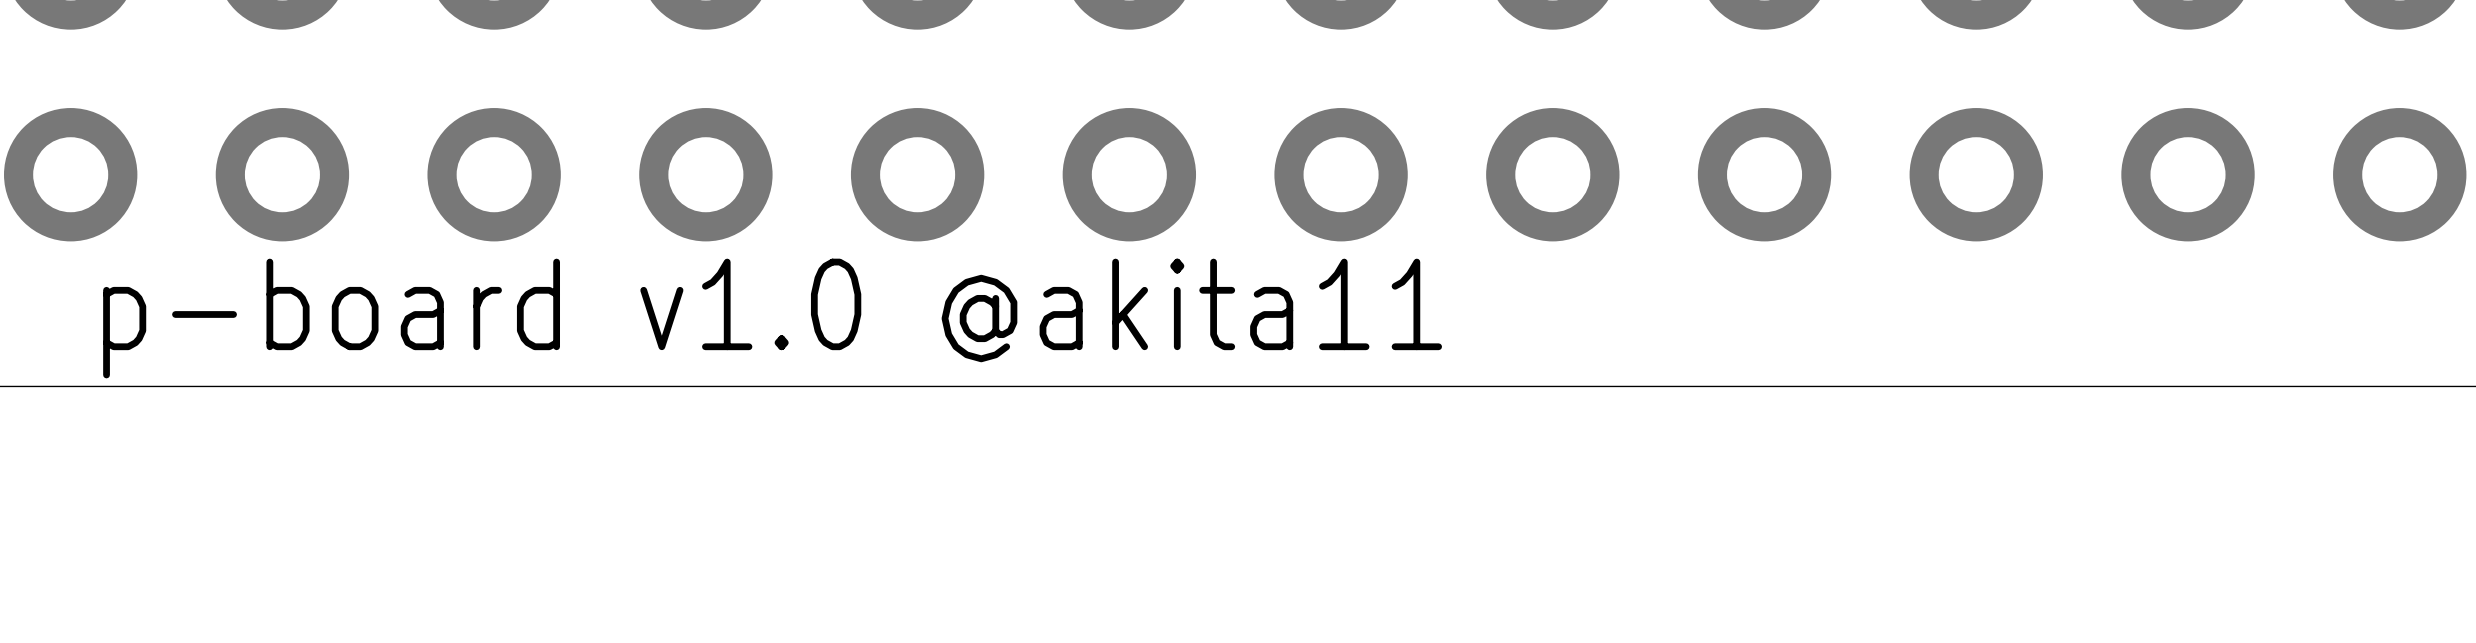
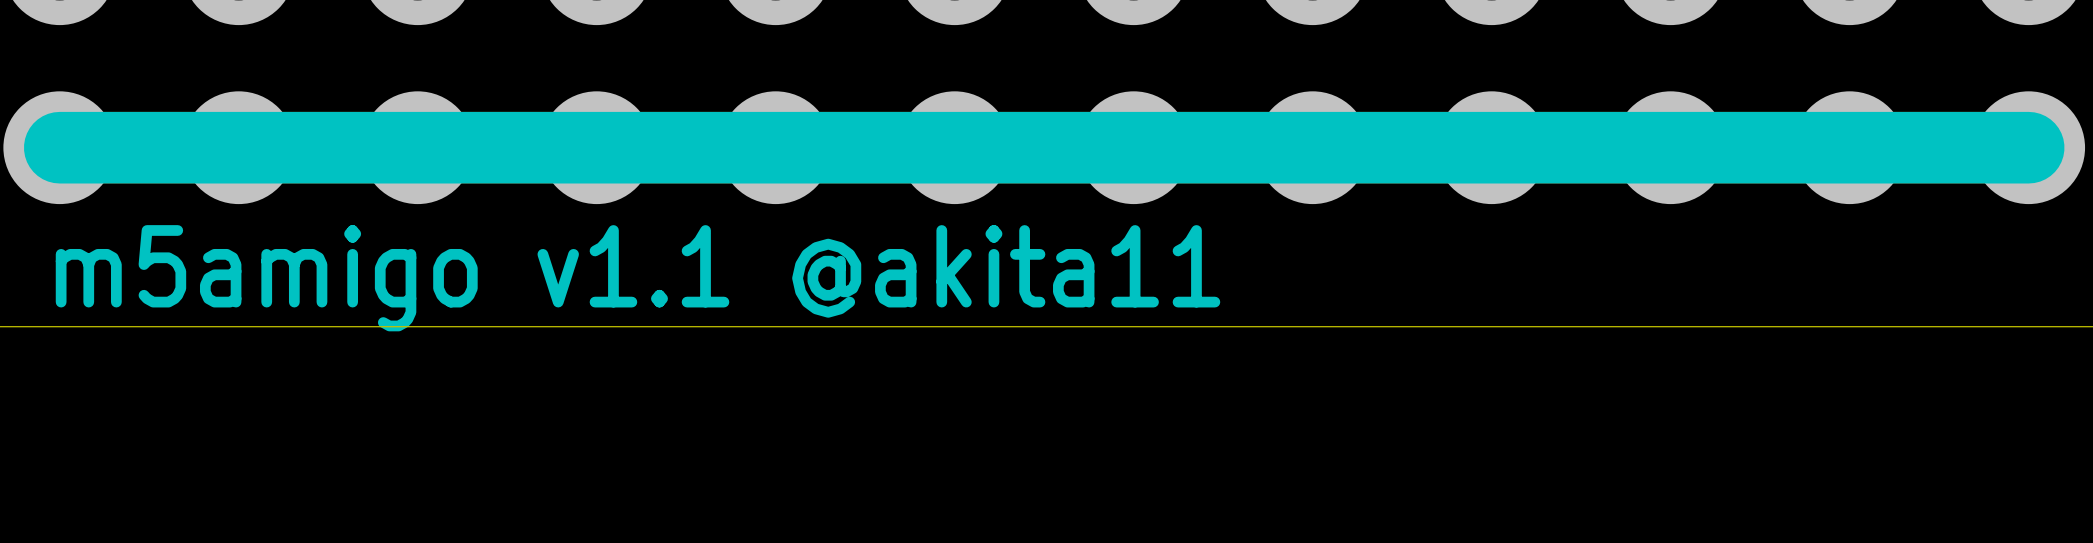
line: none -> (59, 147) (2028, 147)
text: p-board v1.0 @akita11 (772, 318) -> m5amigo v1.1 @akita11 (638, 278)

